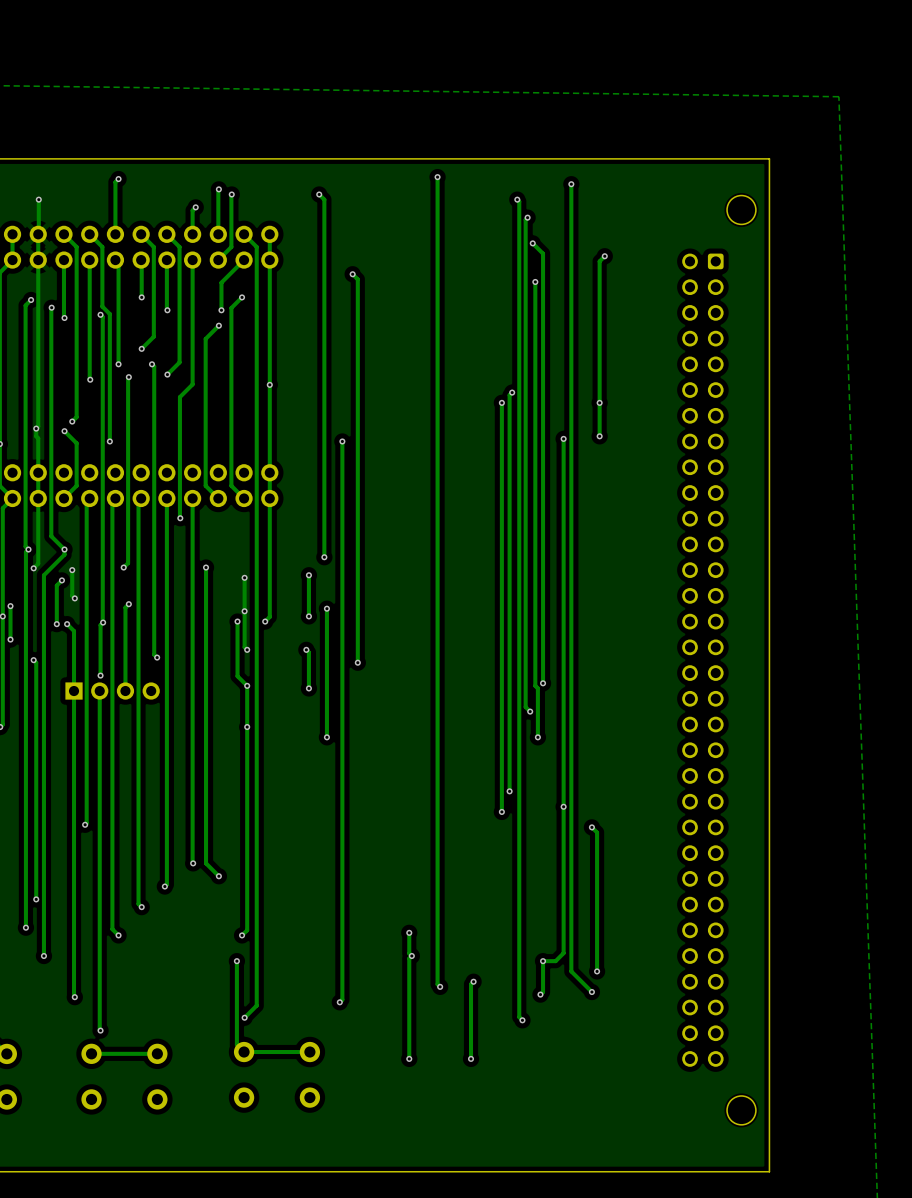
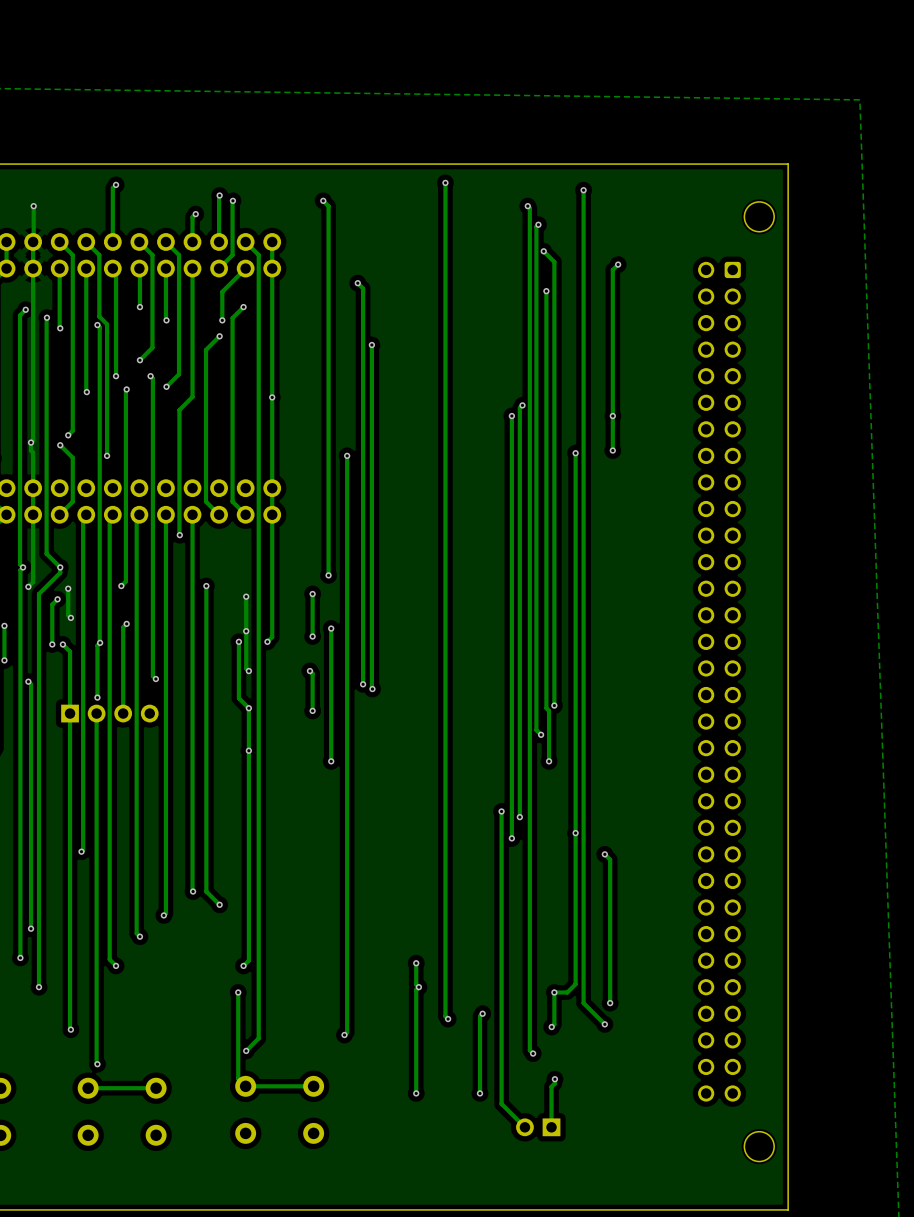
track: none -> (371, 345) (372, 689)
via: none -> (371, 345)
via: none -> (372, 689)
track: none -> (501, 811) (501, 1103) (524, 1127)
via: none -> (501, 811)
track: none -> (554, 1079) (554, 1083) (551, 1086) (551, 1127)
via: none -> (554, 1079)
part: none -> (538, 1127)

